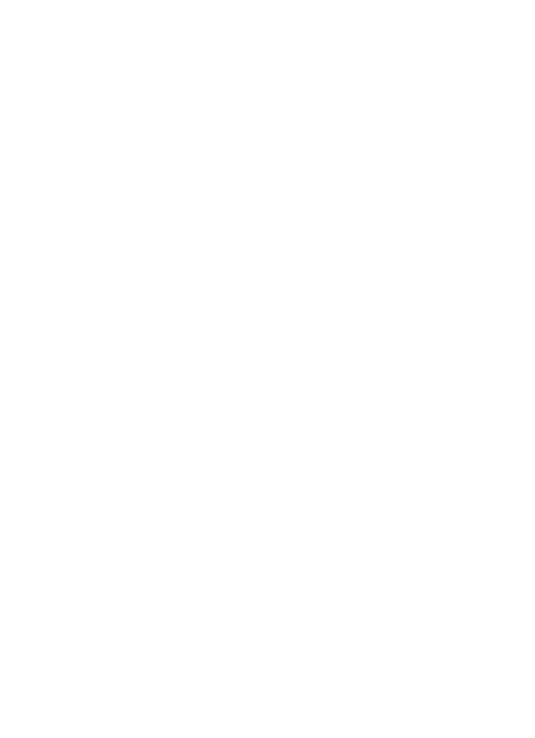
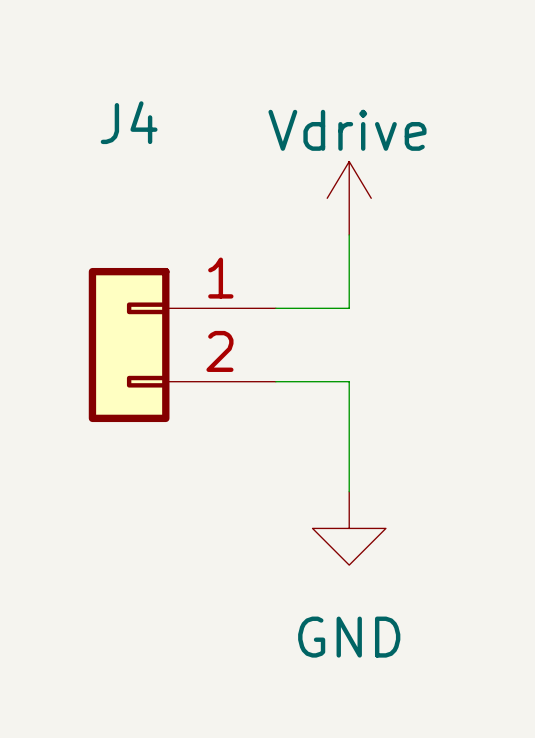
power symbol: none -> Vdrive (349, 198)
wire: none -> (349, 234) (349, 308) (275, 308)
J4: none -> (182, 345)
wire: none -> (275, 381) (349, 381) (349, 491)
power symbol: none -> GND (349, 528)

